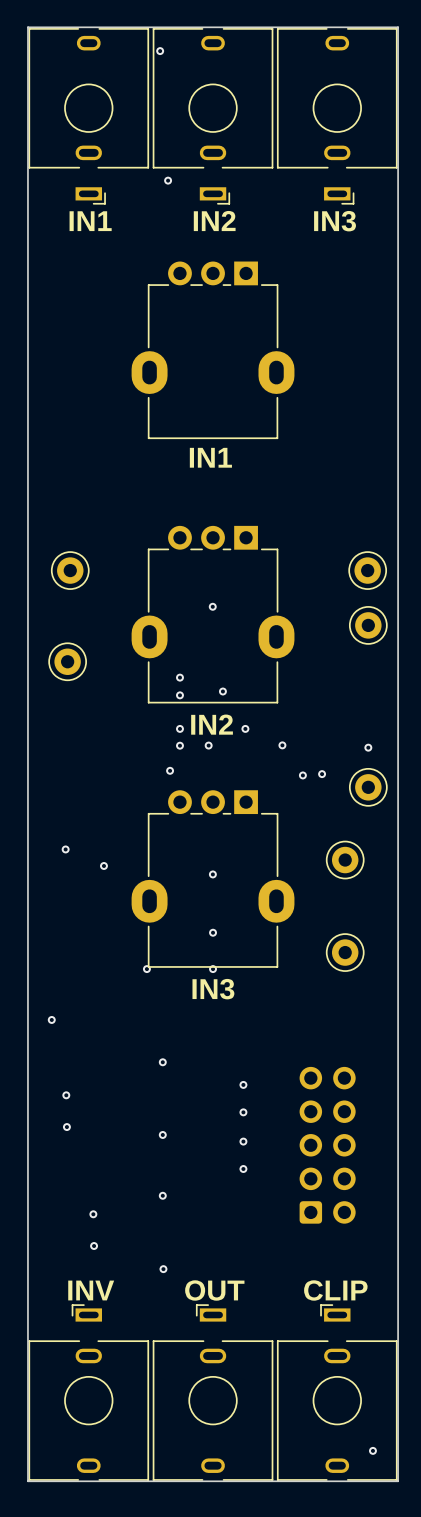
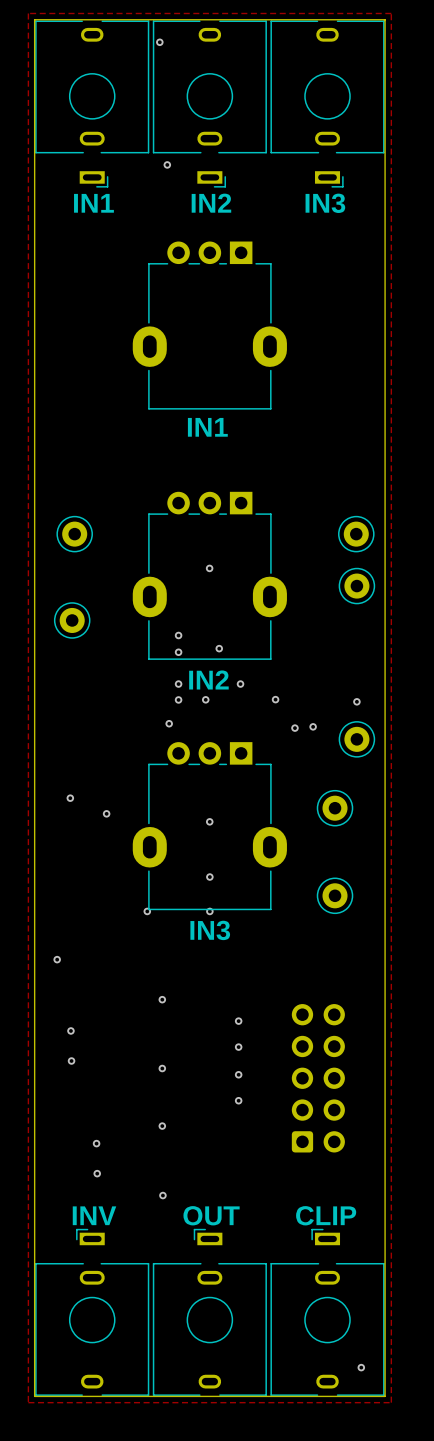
zone outline: none -> (28, 13) (391, 13) (391, 1402) (28, 1402) (28, 13)

